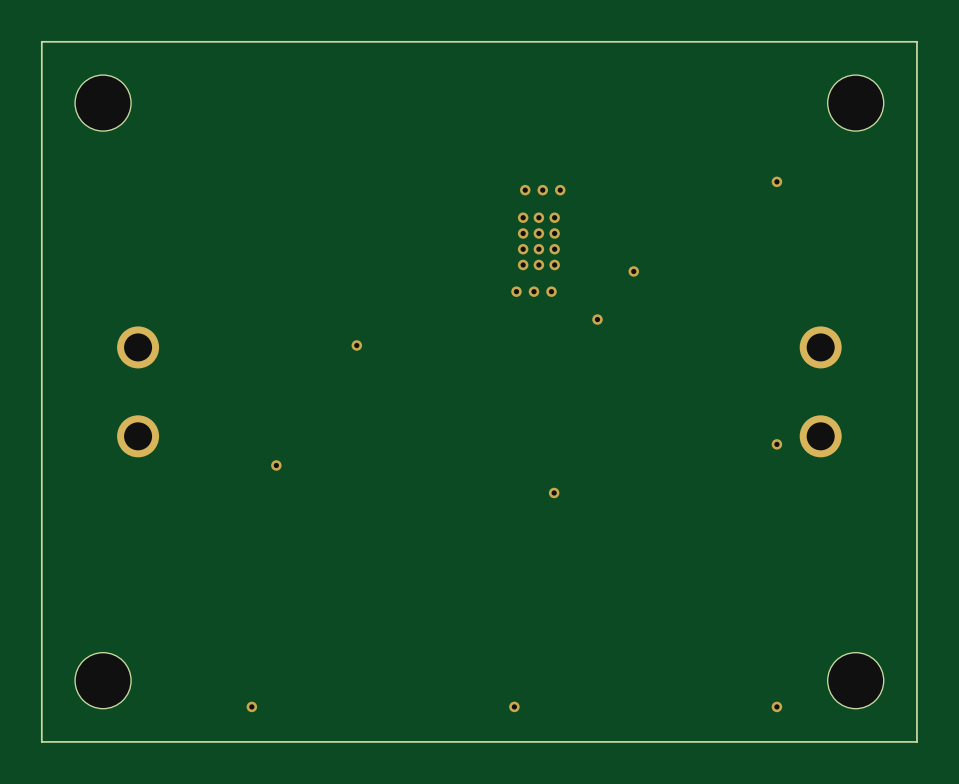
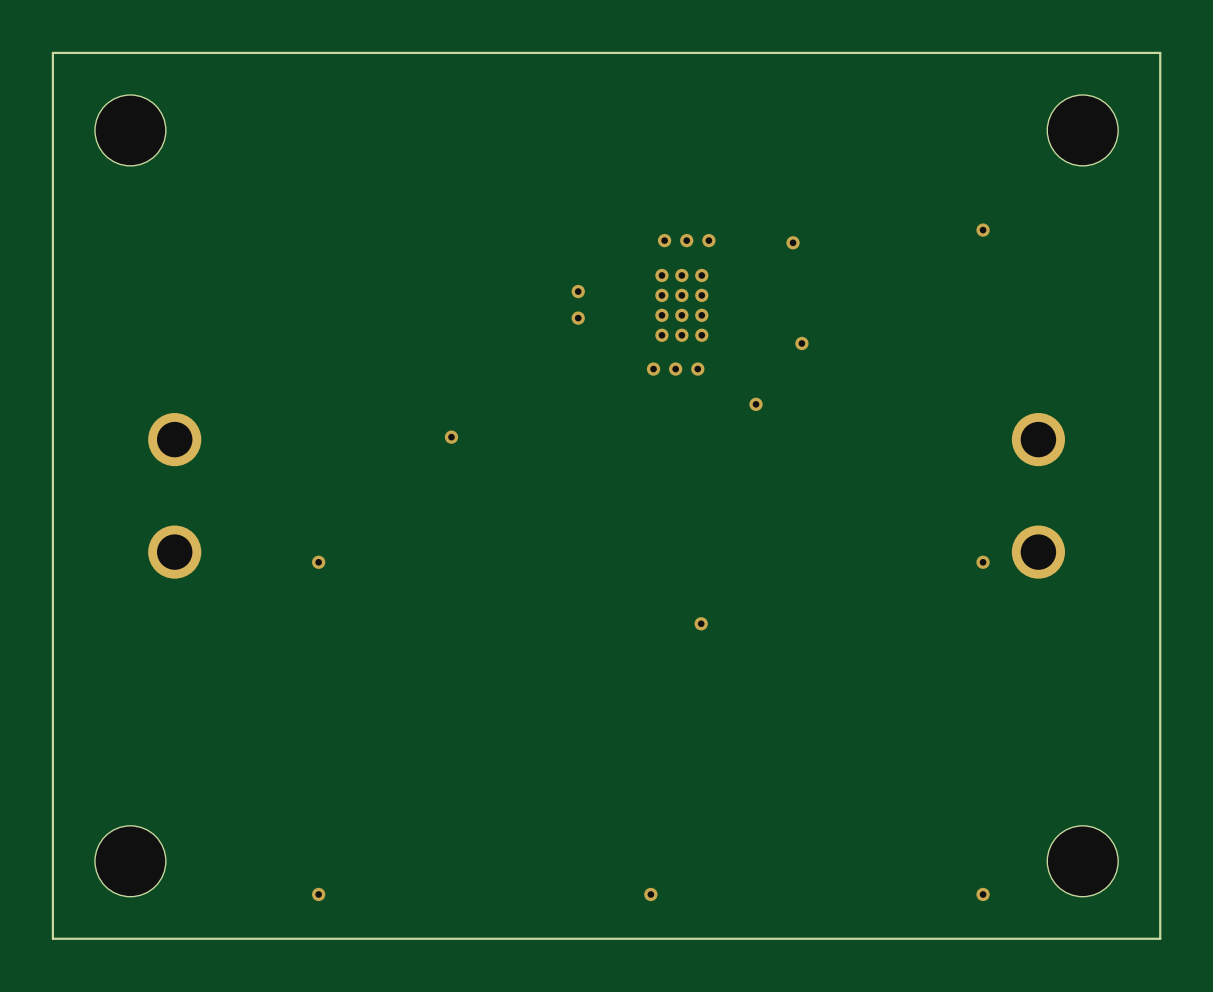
via: none -> (793, 242)
via: none -> (578, 291)
via: none -> (578, 318)
via position: (276, 465) -> (318, 562)

